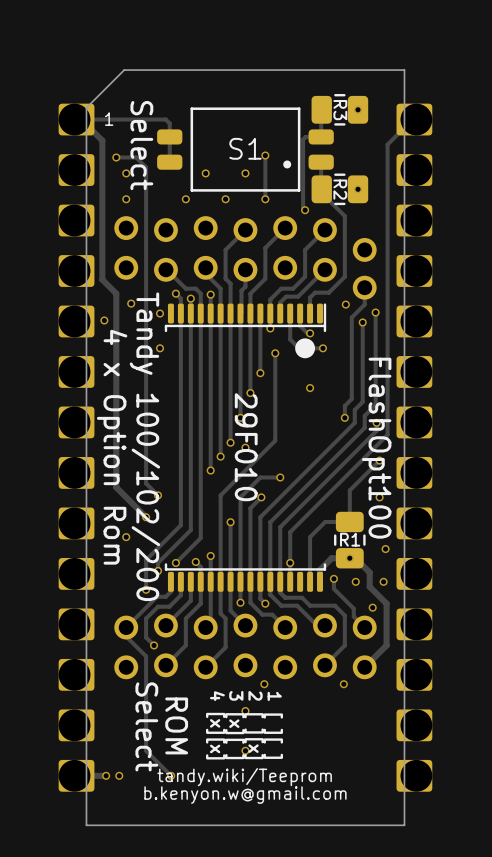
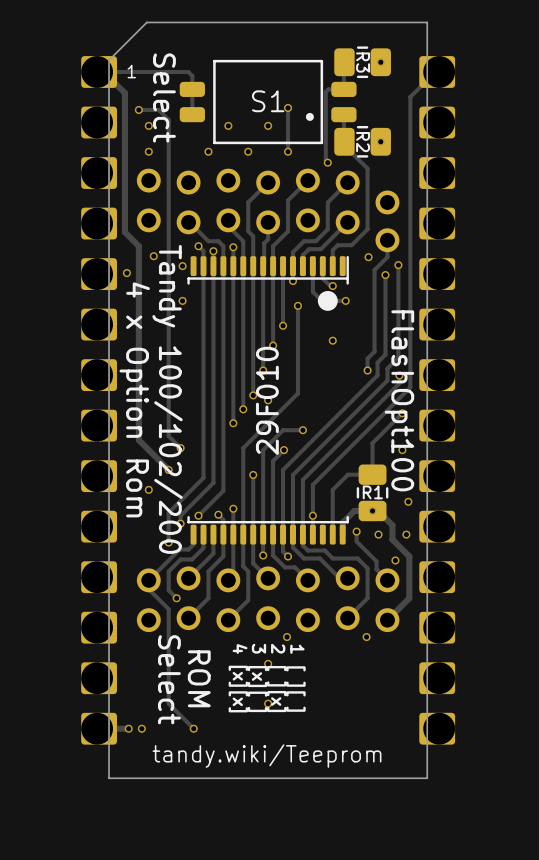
part value rotation: 0° (246, 447) -> 180° (267, 400)
text: tandy.wiki/Teeprom (244, 777) -> none
text: b.kenyon.w@gmail.com (245, 795) -> tandy.wiki/Teeprom (267, 756)

